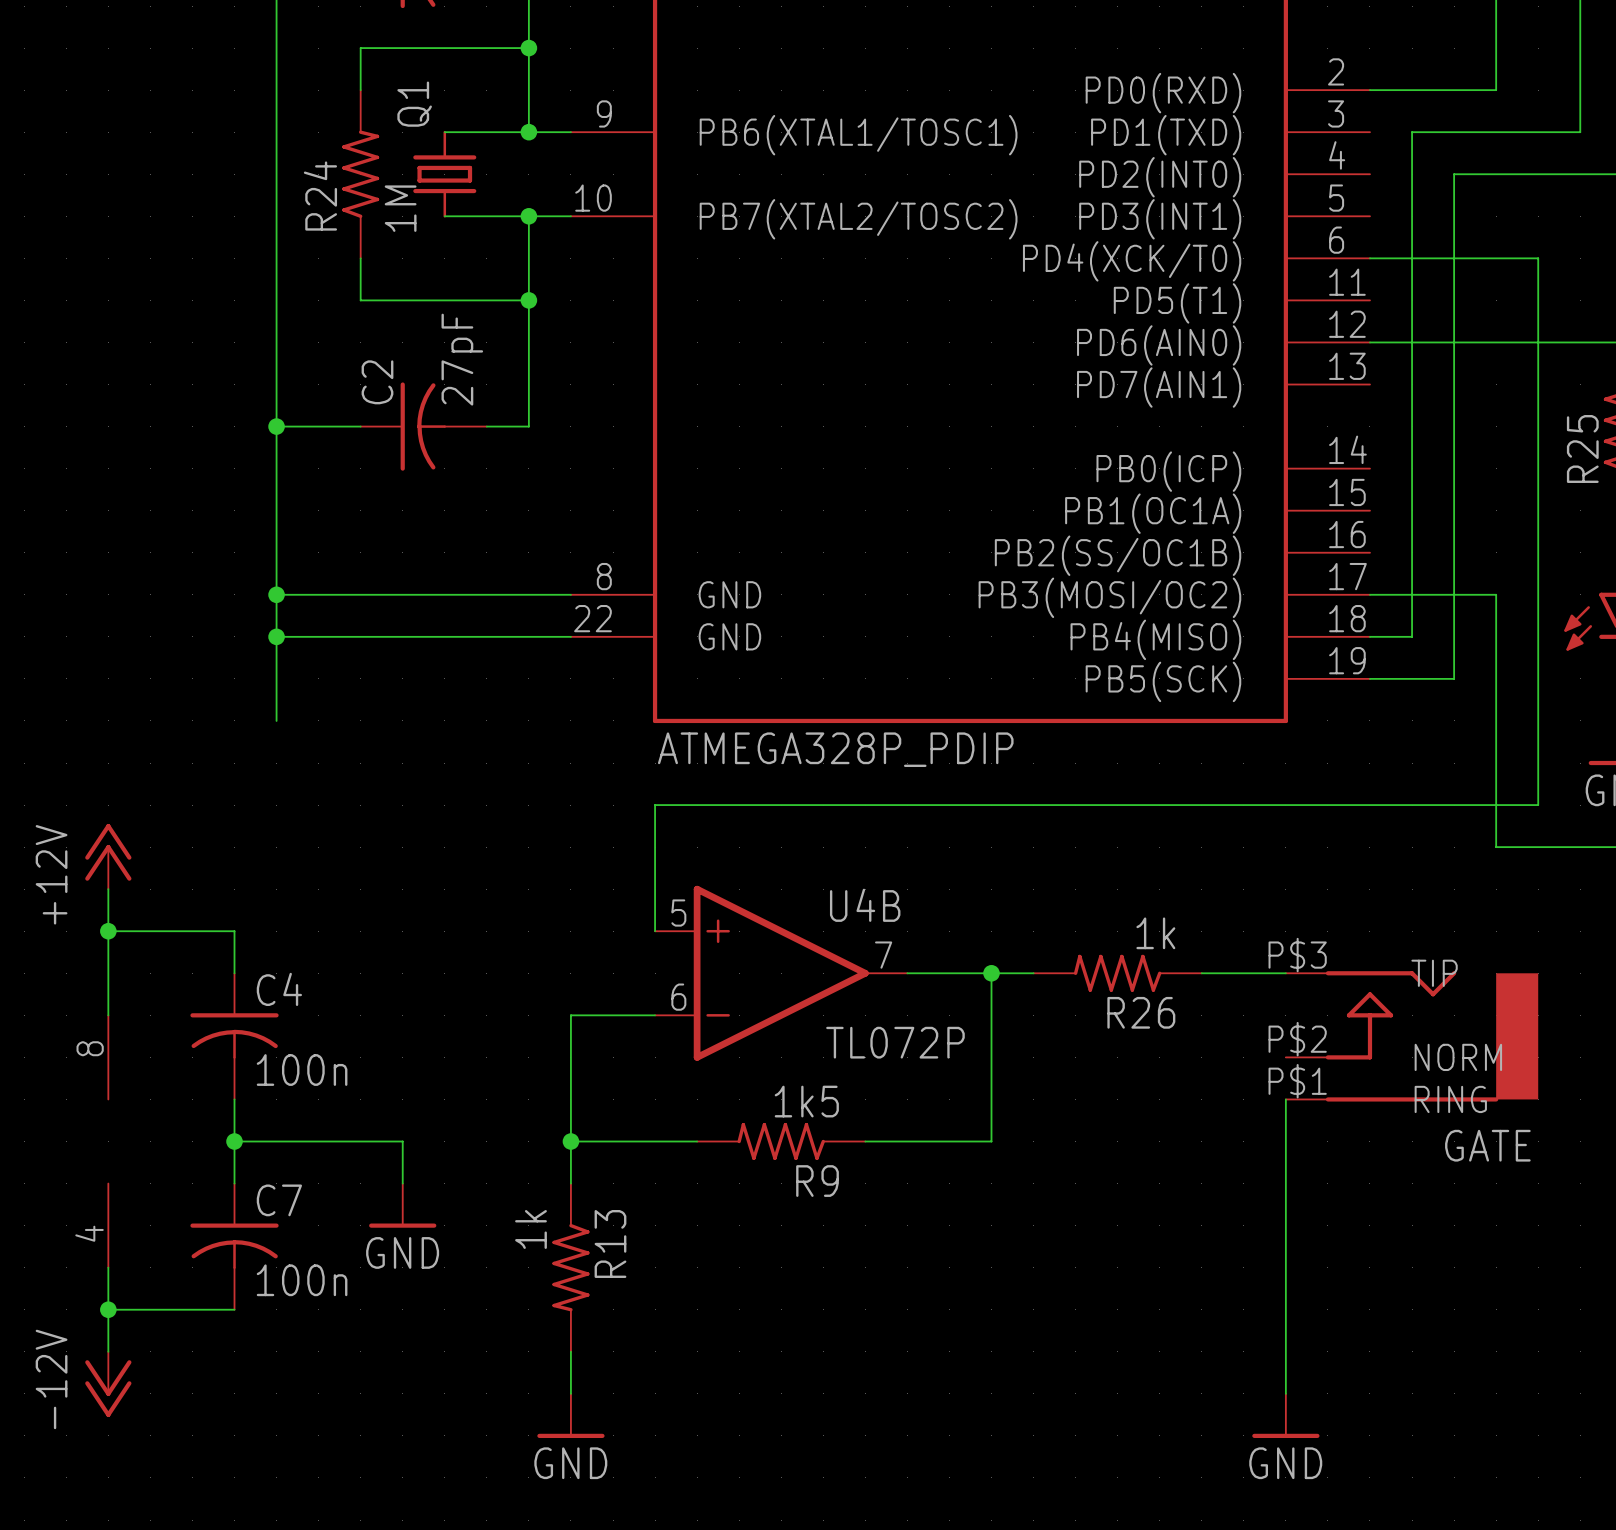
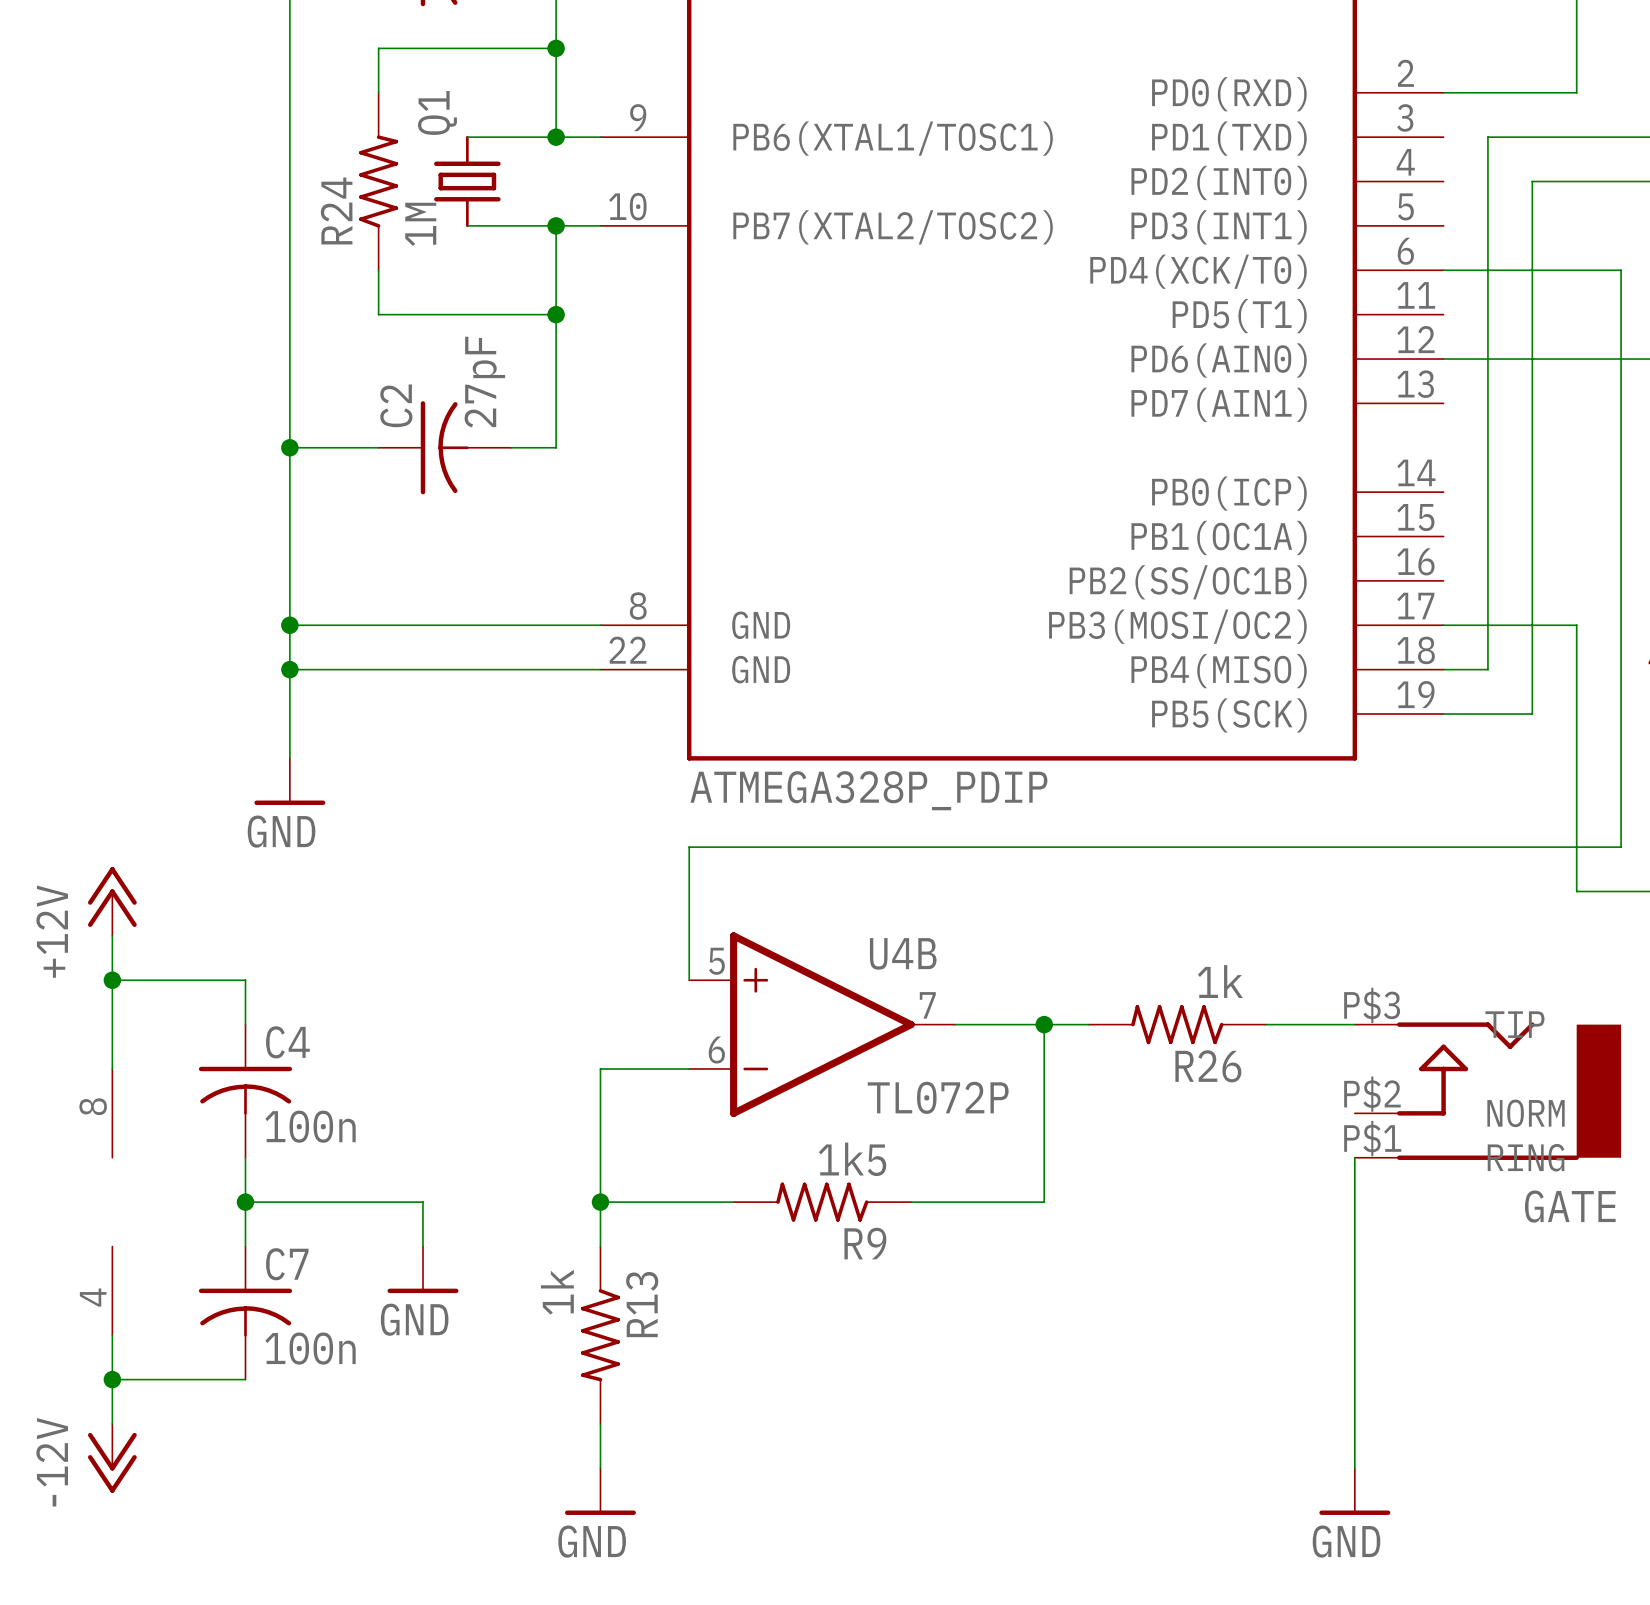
power symbol: none -> GND (289, 781)

